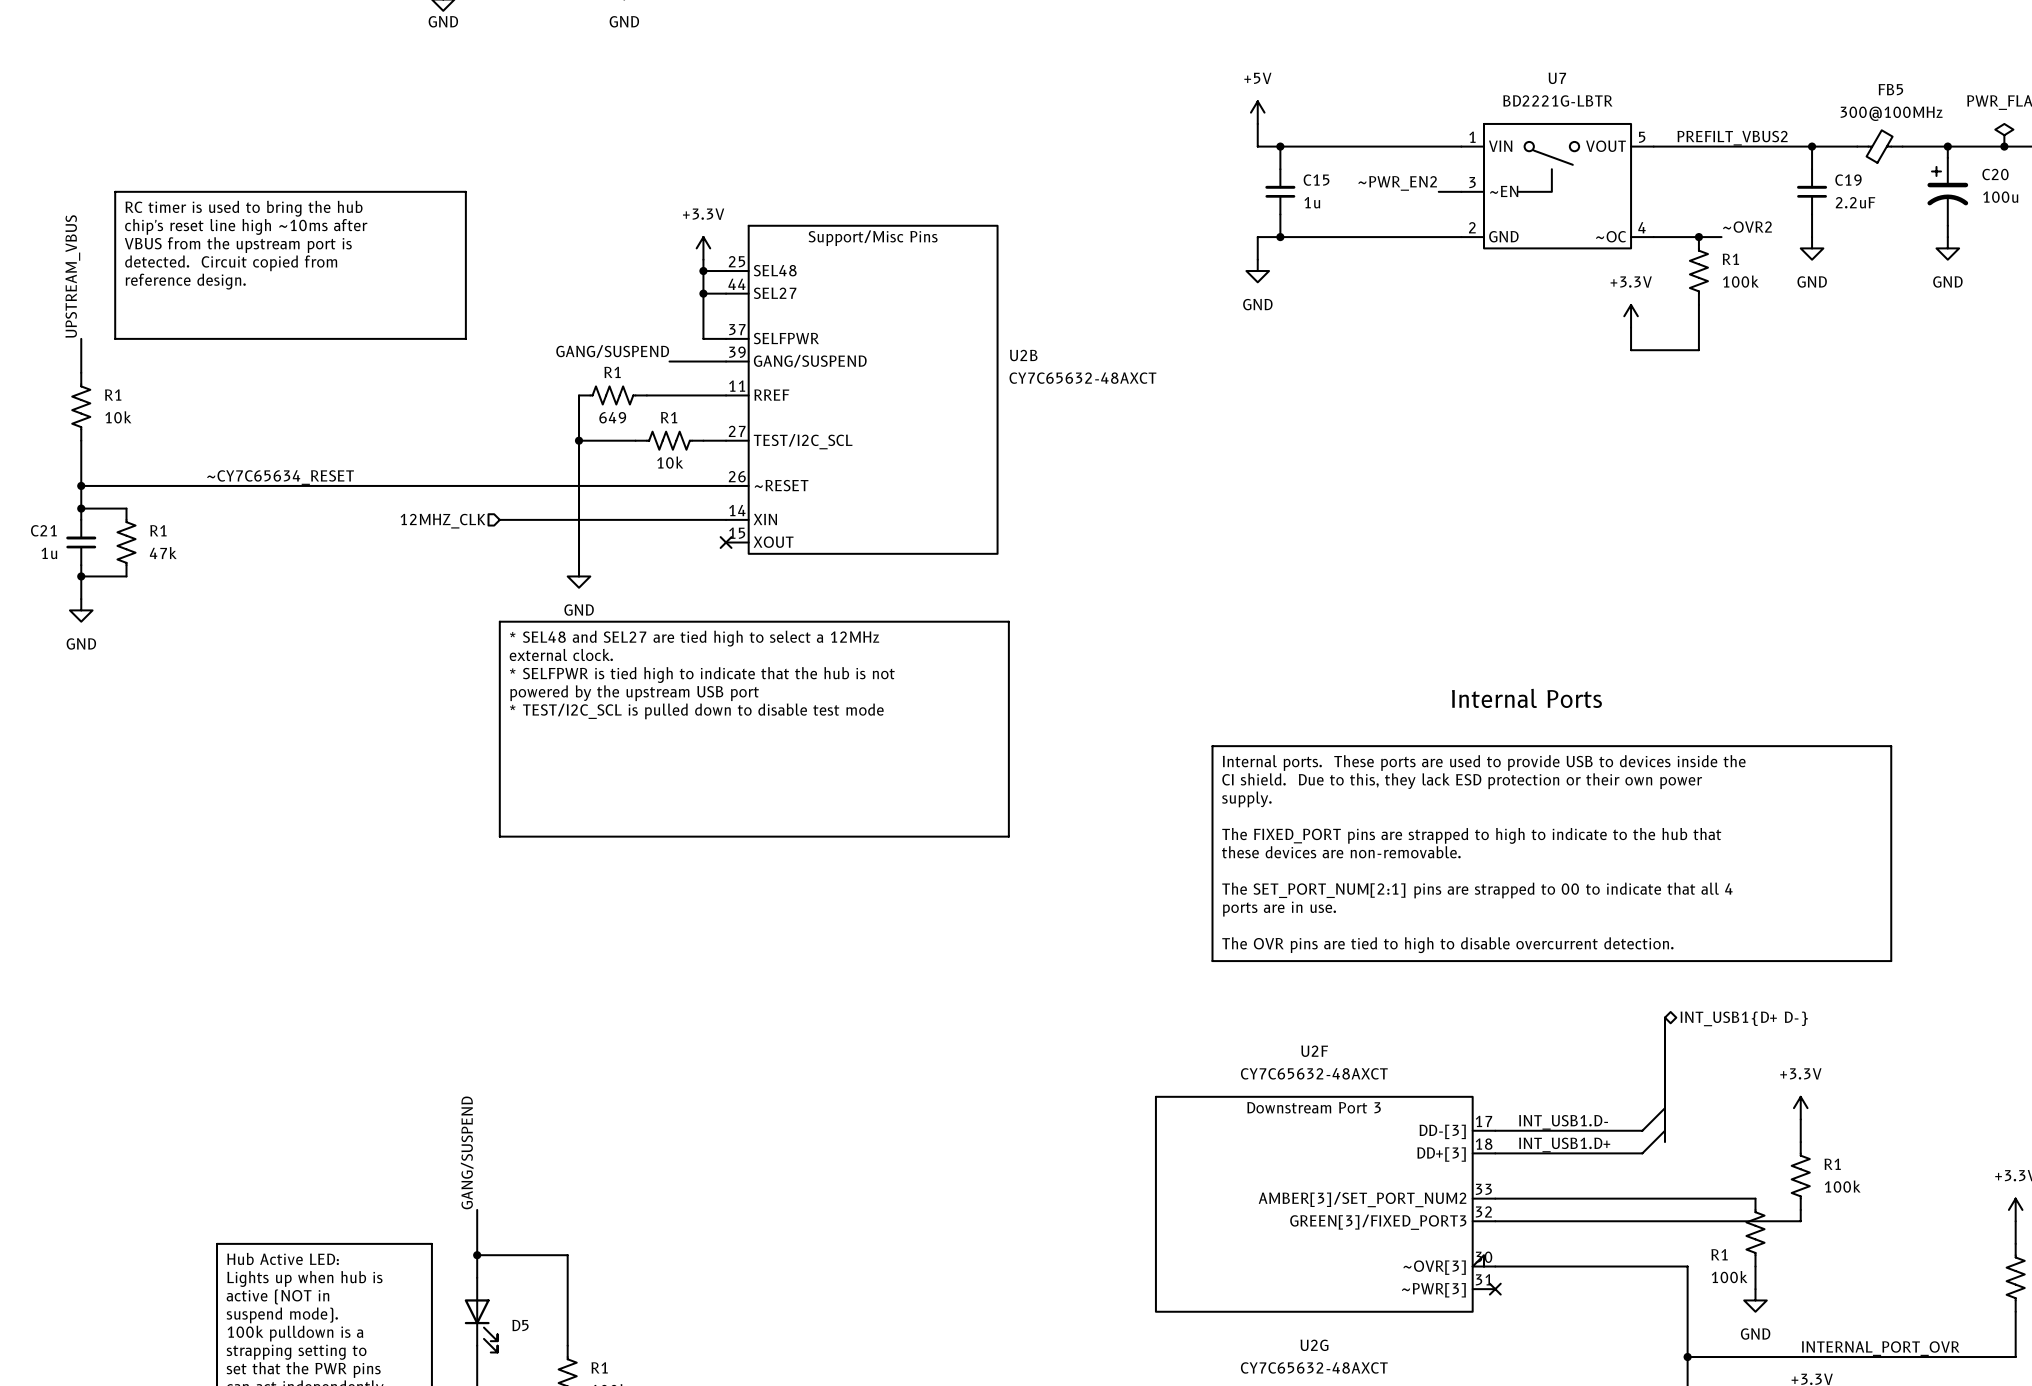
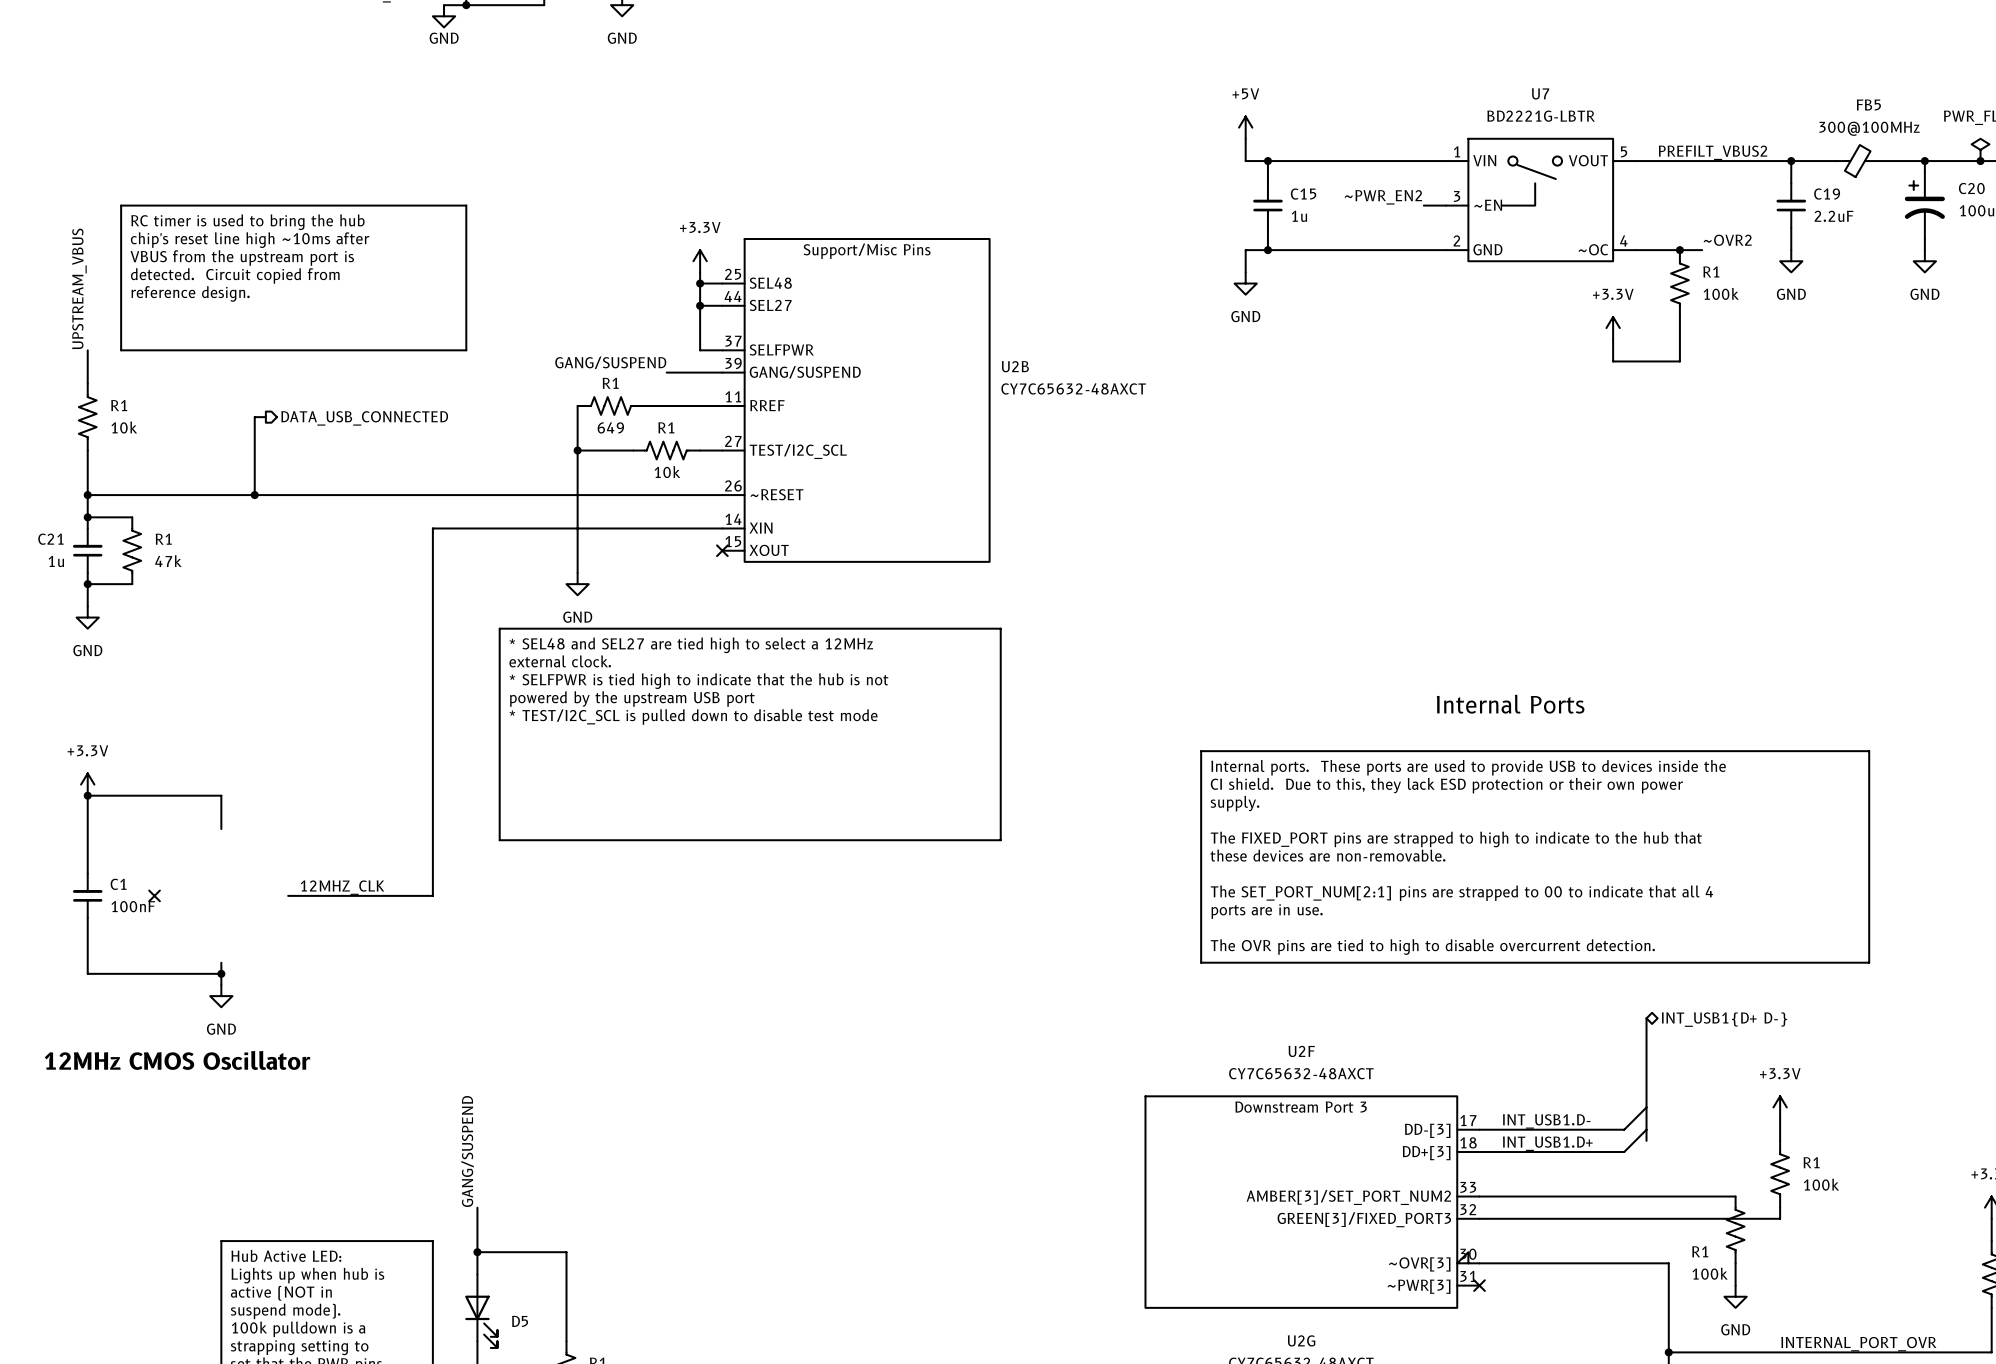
wire: none -> (265, 417) (254, 417) (254, 495)
hierarchical label: none -> DATA_USB_CONNECTED (364, 418)
label: ~CY7C65634_RESET (280, 477) -> none
junction: none -> (254, 495)
wire: none -> (499, 528) (432, 528) (432, 895) (288, 895)
hierarchical label: 12MHZ_CLK (442, 521) -> none
power symbol: none -> +3.3V (87, 784)
junction: none -> (87, 795)
wire: none -> (221, 829) (221, 795) (87, 795) (87, 873)
label: none -> 12MHZ_CLK (342, 887)
C1: none -> 100nF (87, 895)
no-connect mark: none -> (154, 895)
wire: none -> (87, 918) (87, 973) (221, 973)
wire: none -> (221, 962) (221, 984)
junction: none -> (221, 973)
power symbol: none -> GND (221, 996)
text: none -> 12MHz CMOS Oscillator (177, 1060)

